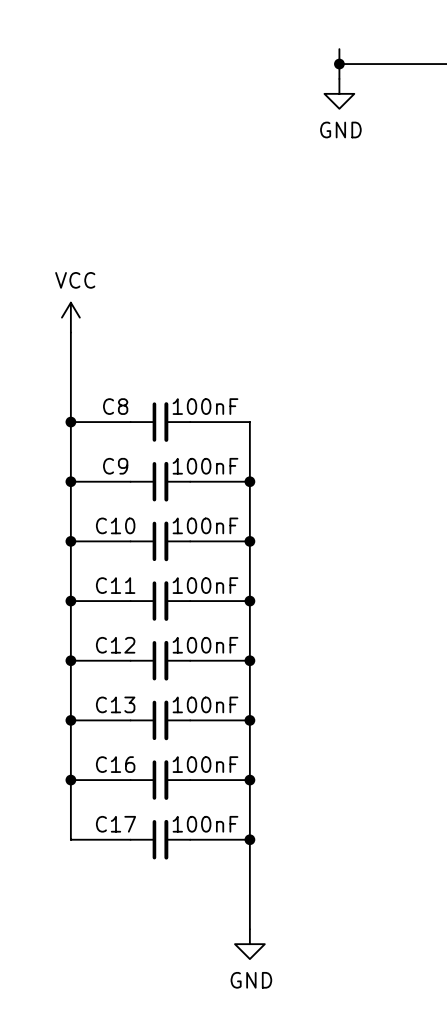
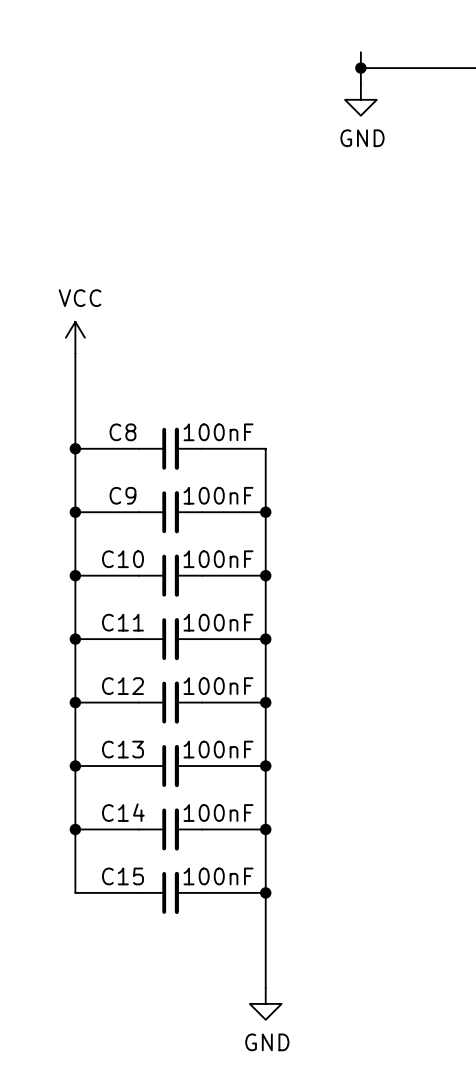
C16 name: C16 (115, 764) -> C14 (123, 812)
C17 name: C17 (116, 824) -> C15 (122, 876)

